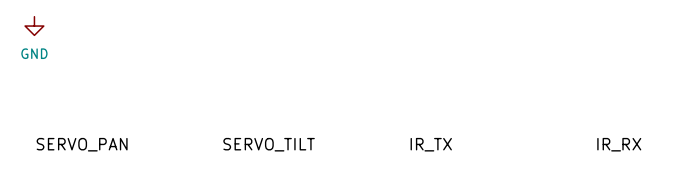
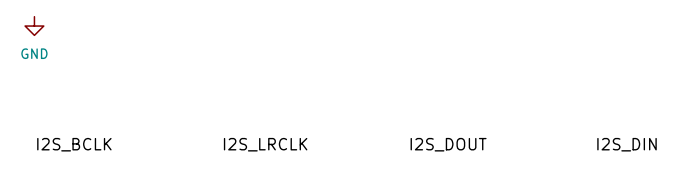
label: SERVO_PAN (82, 144) -> I2S_BCLK (74, 144)
label: SERVO_TILT (269, 144) -> I2S_LRCLK (265, 144)
label: IR_TX (431, 144) -> I2S_DOUT (448, 144)
label: IR_RX (619, 144) -> I2S_DIN (627, 144)

